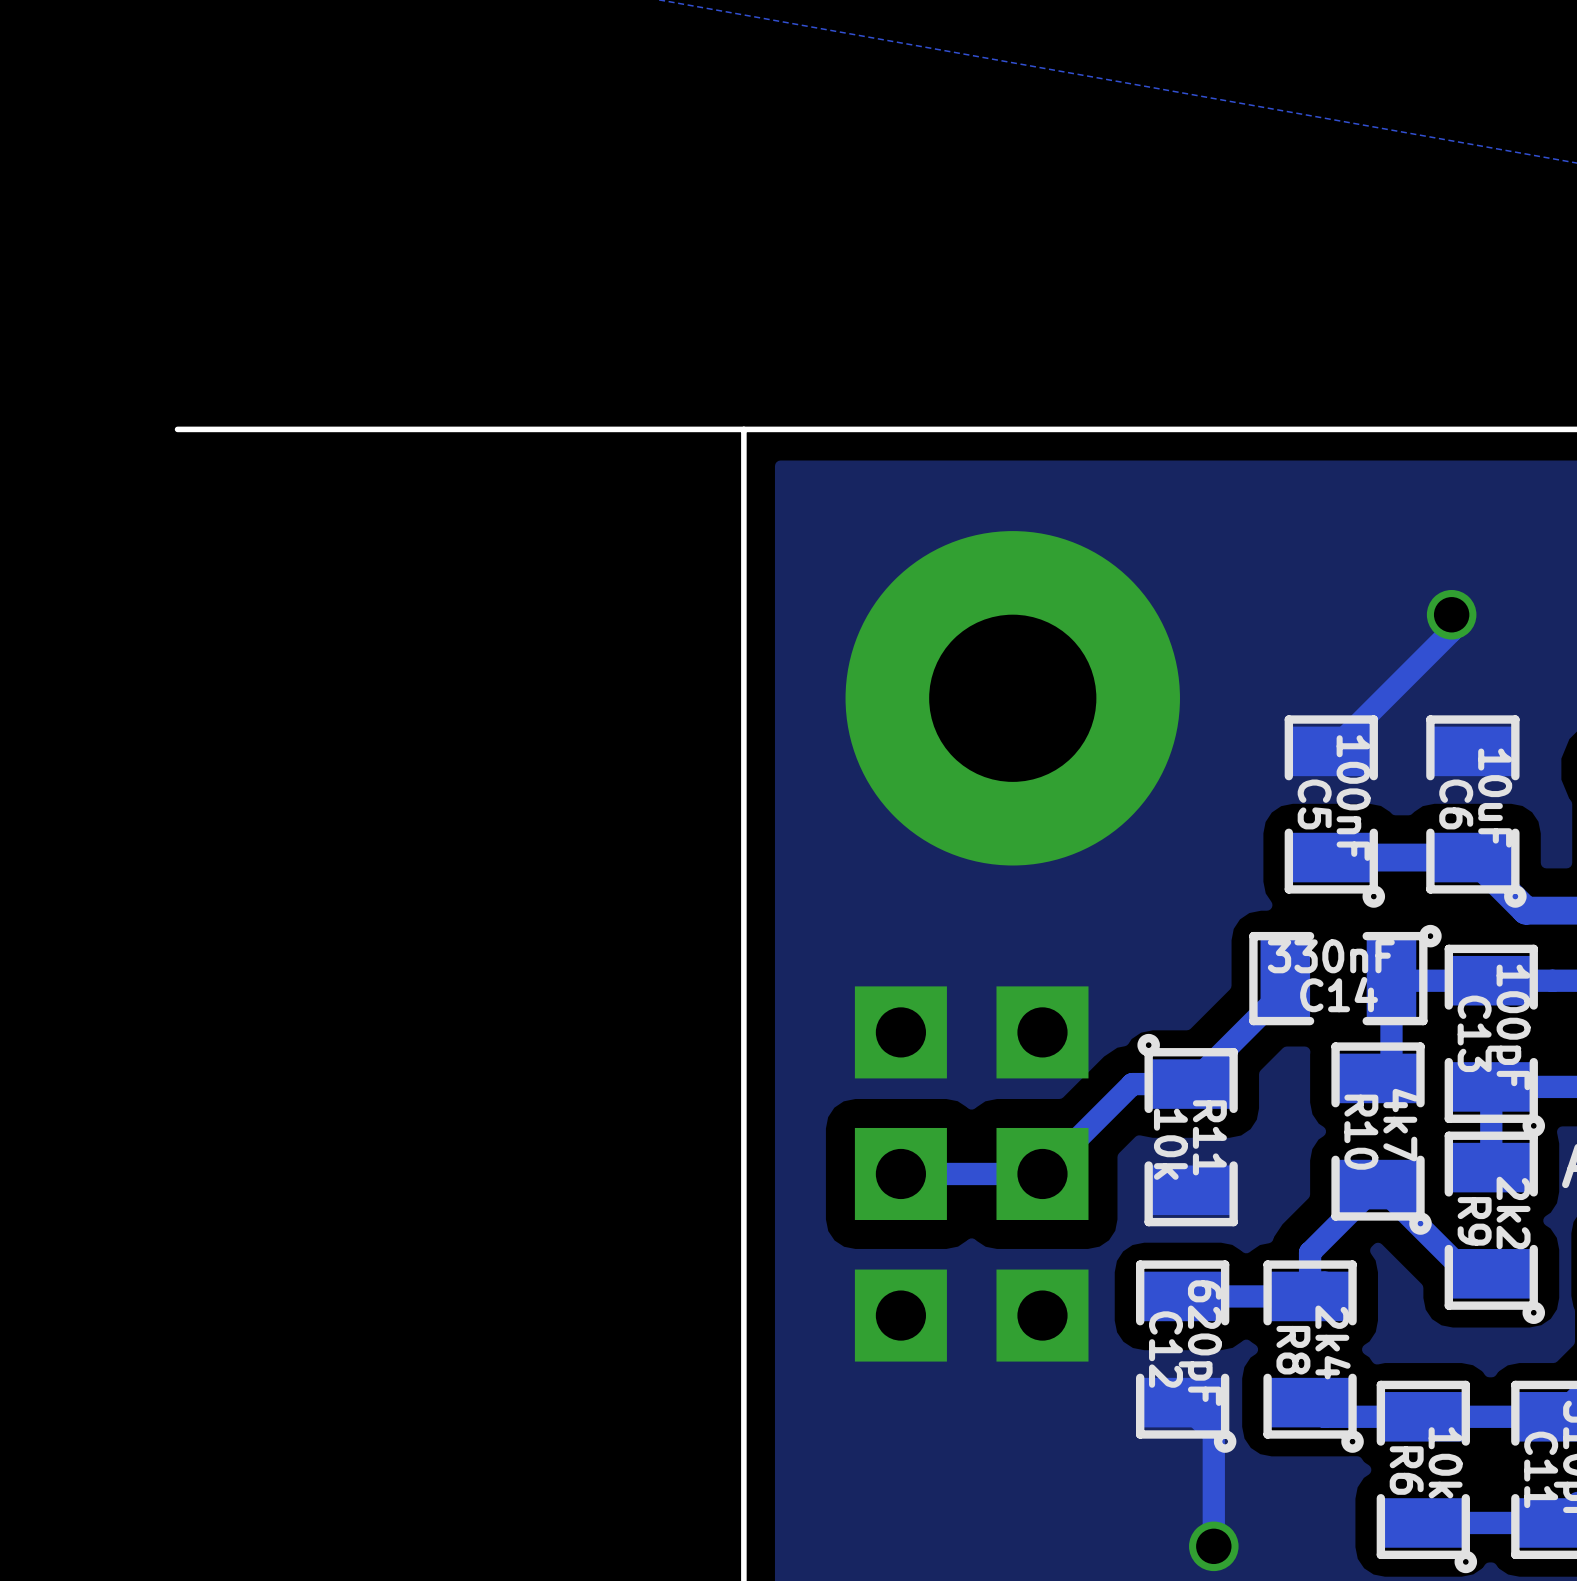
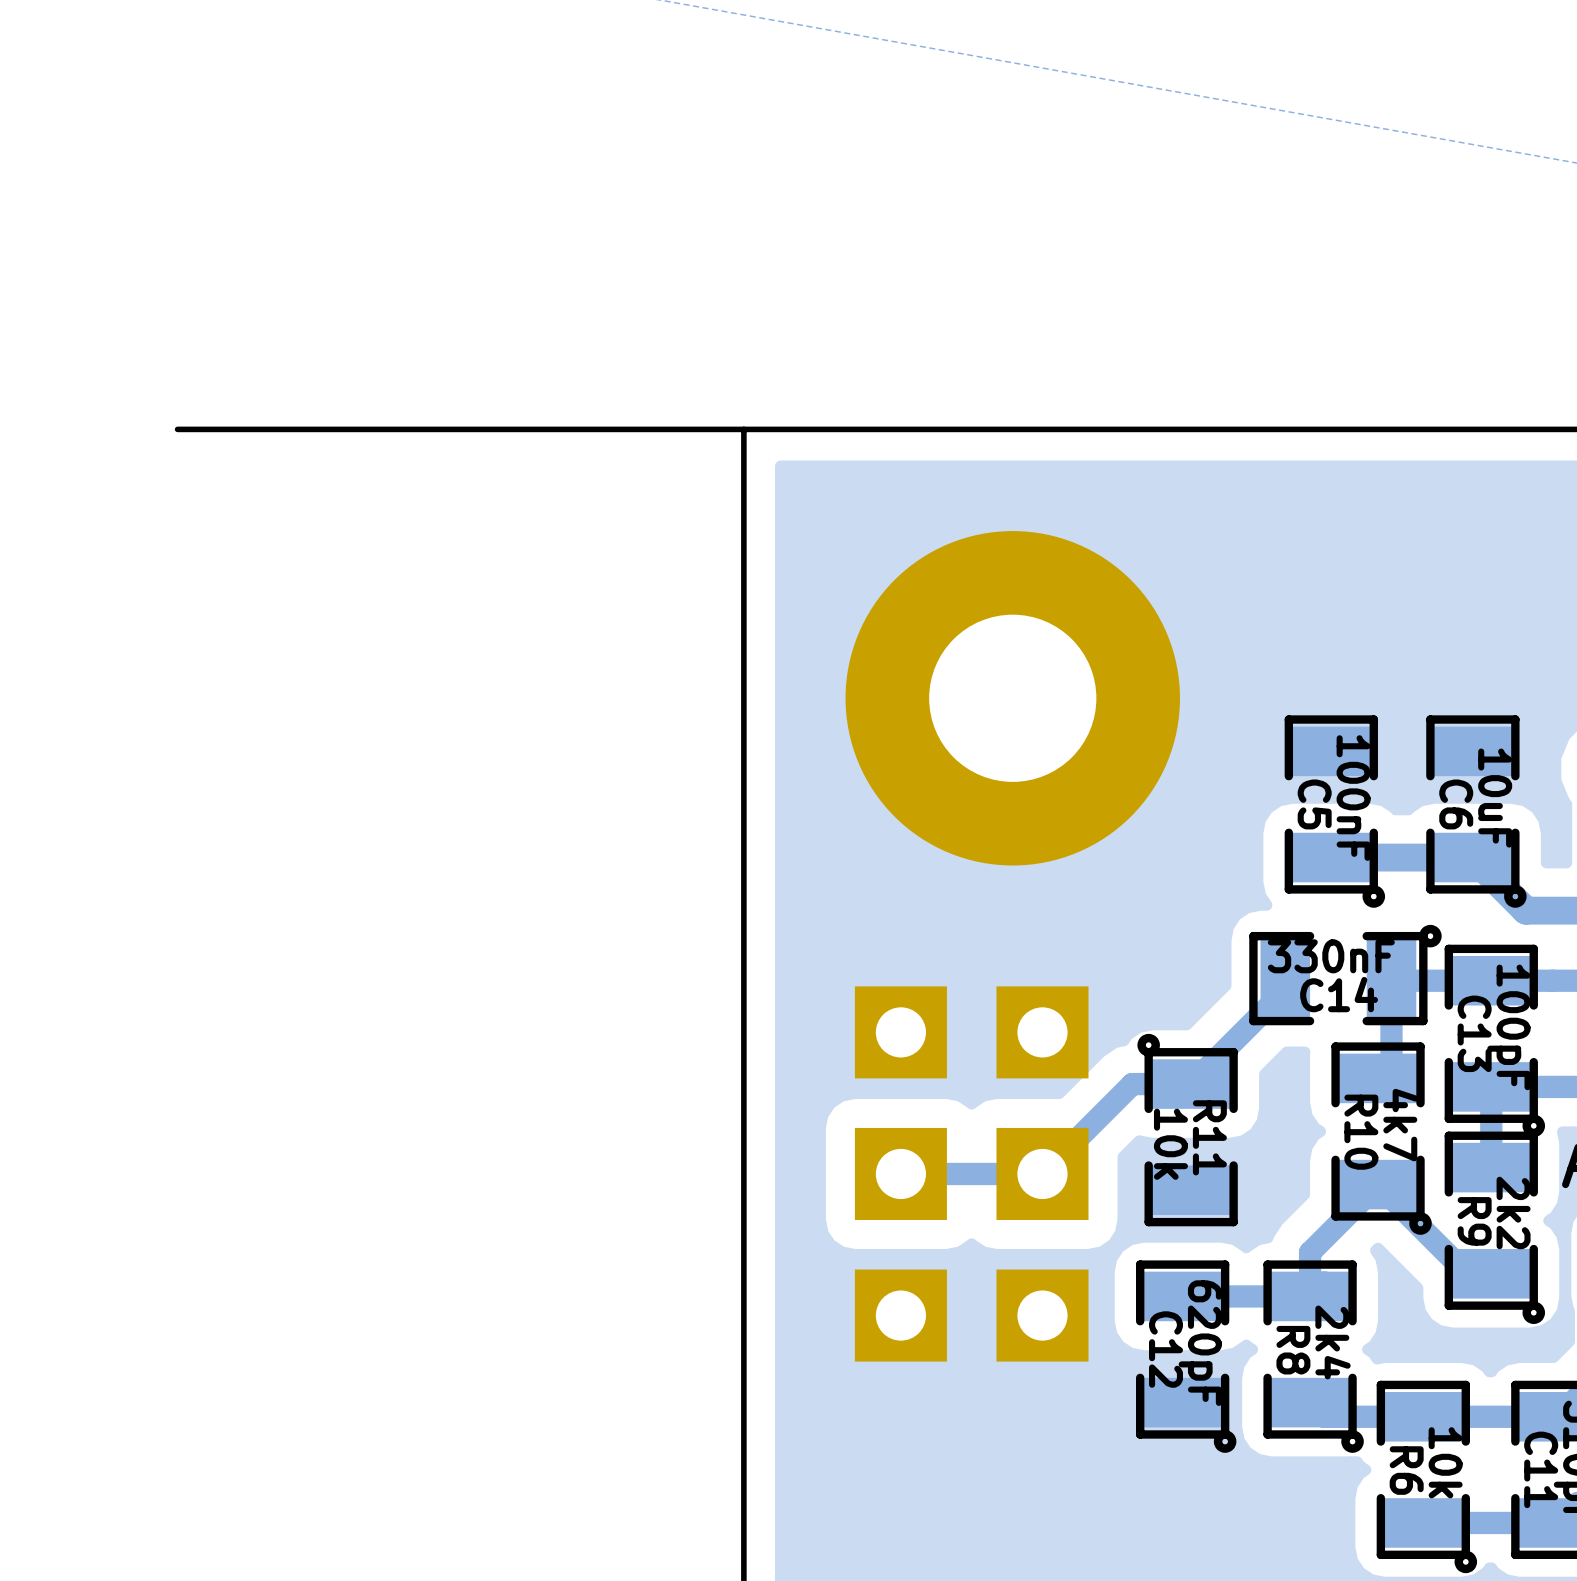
track: (1451, 614) (1451, 631) (1331, 751) -> none
via: (1451, 614) -> none
track: (1182, 1402) (1213, 1433) (1213, 1546) -> none
via: (1213, 1546) -> none

